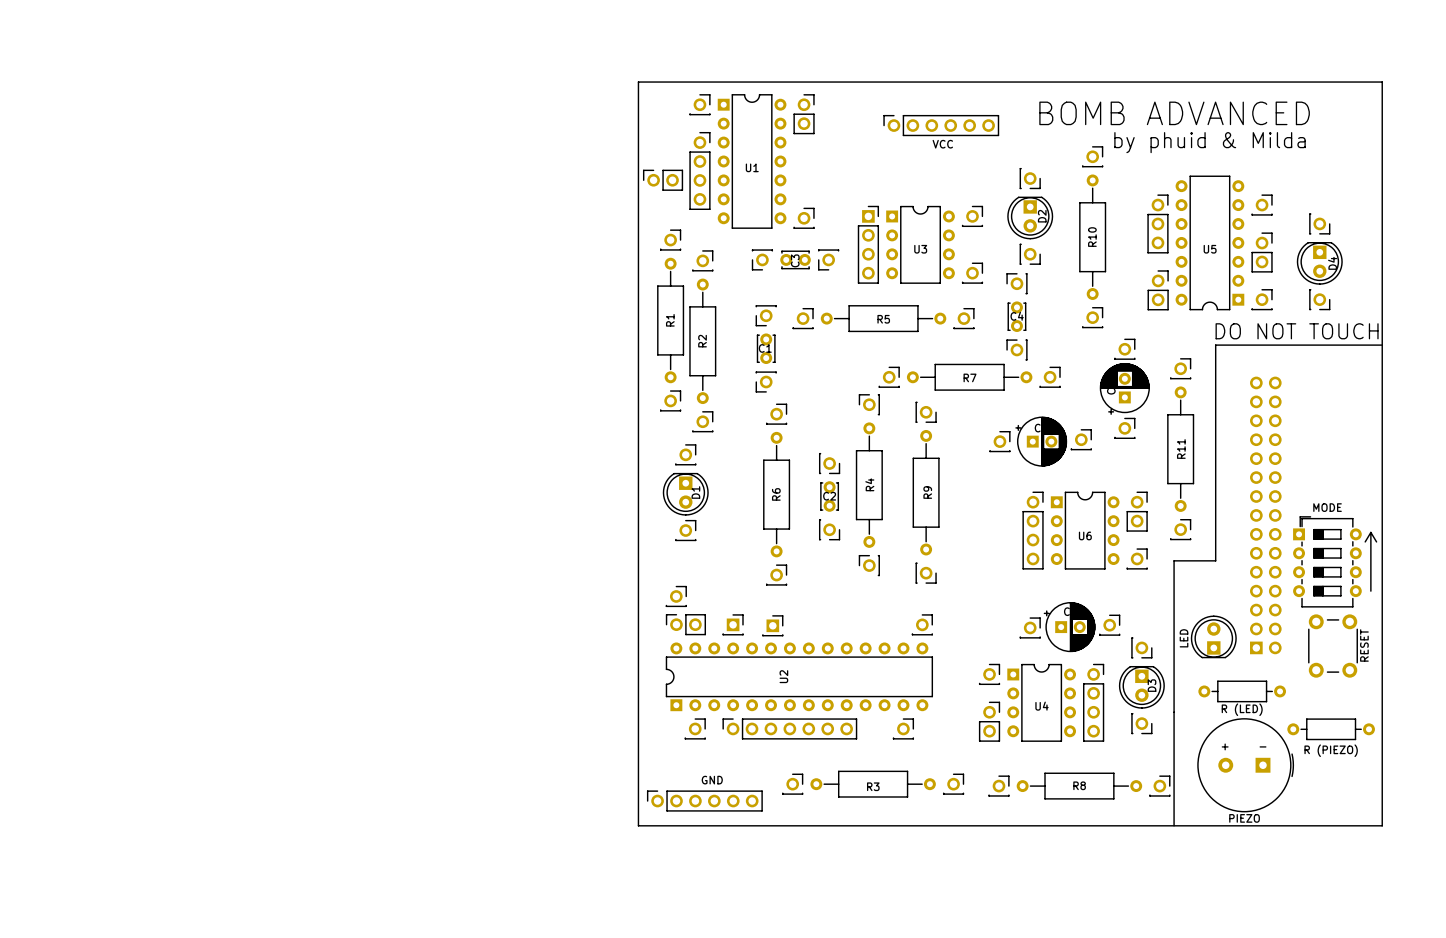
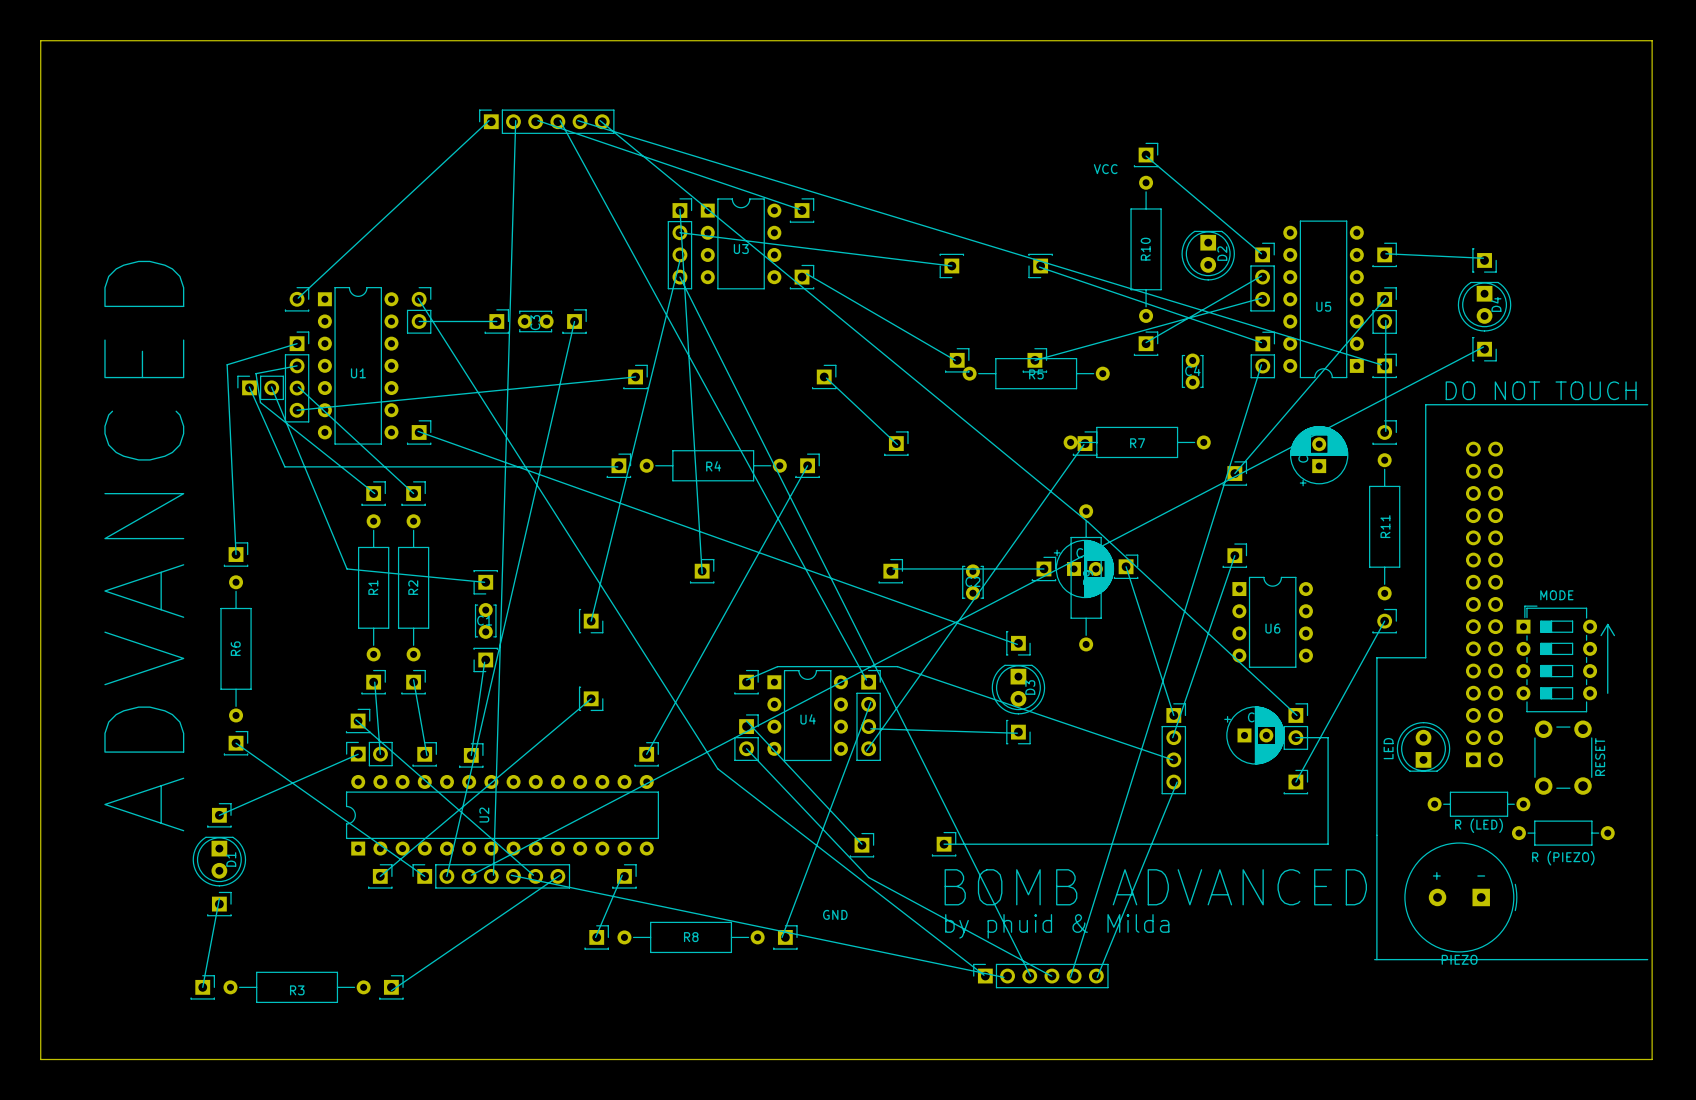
board edge: none -> (40, 40) (1652, 40) (1652, 1059) (40, 1059) (40, 40)
board edge: (638, 82) (1382, 82) (1382, 825) (638, 825) (638, 82) -> none
line: none -> (489, 120) (298, 298)
line: none -> (515, 120) (493, 875)
line: none -> (537, 120) (799, 209)
line: none -> (560, 120) (866, 679)
line: none -> (577, 120) (1381, 364)
line: none -> (600, 120) (1088, 522) (1296, 715)
part: none -> (546, 121)
part: (699, 104) -> none
text: BOMB ADVANCED (1174, 113) -> none
part: (804, 114) -> none
part: (941, 125) -> none
part: none -> (1146, 155)
line: none -> (1146, 156) (1261, 253)
text: by phuid & Milda (1210, 142) -> none
part: (1092, 156) -> none
U1 position: (752, 161) -> (358, 365)
part: (699, 170) -> none
line: none -> (679, 209) (702, 573)
part: (1030, 178) -> none
part: none -> (802, 210)
part: (663, 180) -> none
line: none -> (679, 232) (951, 266)
part: (1262, 205) -> none
part: none -> (679, 243)
part: (972, 216) -> none
line: none -> (1385, 253) (1483, 258)
part: none -> (1384, 254)
part: (804, 218) -> none
line: none -> (679, 260) (591, 621)
part: none -> (1484, 260)
part: (1157, 223) -> none
part: (1319, 223) -> none
part: none -> (951, 266)
part: none -> (1040, 266)
line: none -> (1039, 267) (1261, 342)
line: none -> (806, 273) (955, 360)
line: none -> (1261, 275) (1146, 342)
line: none -> (679, 277) (1030, 976)
part: none -> (802, 277)
part: none -> (1262, 277)
R10 position: (1092, 237) -> (1146, 249)
part: (670, 240) -> none
U5 position: (1209, 242) -> (1323, 299)
D4 footprint: [1297, 242, 1343, 285] -> [1457, 281, 1512, 332]
part: (868, 244) -> none
U3 position: (920, 244) -> (741, 243)
part: (1262, 252) -> none
line: none -> (418, 298) (717, 768) (984, 975)
part: (1030, 254) -> none
line: none -> (1261, 298) (1035, 360)
line: none -> (1385, 298) (1234, 473)
part: none -> (297, 299)
part: (762, 259) -> none
C3 position: (795, 259) -> (535, 321)
part: (828, 259) -> none
part: (702, 260) -> none
part: none -> (419, 310)
part: none -> (1384, 310)
part: (972, 273) -> none
line: none -> (1385, 320) (1385, 431)
line: none -> (419, 321) (496, 321)
part: none -> (496, 321)
line: none -> (574, 321) (446, 876)
part: none -> (574, 321)
part: (1016, 283) -> none
part footprint: [1251, 289, 1273, 311] -> [1472, 337, 1497, 362]
part: (1158, 290) -> none
line: none -> (297, 343) (227, 364) (236, 554)
part: none -> (1146, 343)
line: none -> (1483, 347) (471, 875)
part: (1319, 299) -> none
part: none -> (1262, 354)
part: none -> (957, 360)
part: none -> (1034, 360)
line: none -> (297, 365) (256, 373) (260, 402) (374, 493)
line: none -> (1261, 364) (1070, 977)
part: none -> (1384, 365)
part: (766, 315) -> none
part: (1092, 317) -> none
part: (803, 318) -> none
part: (963, 318) -> none
R1 position: (670, 320) -> (373, 587)
part: none -> (297, 376)
line: none -> (635, 376) (297, 410)
part: none -> (635, 376)
part: none -> (824, 376)
line: none -> (826, 378) (897, 444)
line: none -> (249, 386) (284, 466) (617, 466)
line: none -> (271, 386) (347, 568) (484, 582)
line: none -> (298, 386) (413, 493)
part: none -> (260, 387)
text position: DO NOT TOUCH (1297, 331) -> DO NOT TOUCH (1541, 390)
R2 position: (702, 341) -> (413, 587)
line: none -> (1621, 404) (1647, 404)
C1 position: (766, 348) -> (485, 620)
part: (1016, 349) -> none
part: (1124, 349) -> none
line: none -> (418, 431) (1017, 644)
part: none -> (419, 432)
part footprint: [755, 371, 777, 393] -> [884, 431, 909, 456]
part: (889, 377) -> none
part: (1050, 377) -> none
part: none -> (1085, 443)
line: none -> (1083, 444) (866, 750)
part: none -> (618, 465)
line: none -> (807, 465) (646, 754)
part: none -> (807, 465)
part: (670, 400) -> none
part: none -> (1234, 473)
part: (869, 404) -> none
part: (926, 412) -> none
part: (776, 414) -> none
part: none -> (373, 493)
part: none -> (413, 493)
part: (702, 421) -> none
part: (1124, 428) -> none
part: (1081, 439) -> none
part: (999, 441) -> none
part position: (1041, 441) -> (1083, 568)
part: (685, 454) -> none
part: (829, 463) -> none
text: none -> ADVANCED (144, 546)
part: none -> (236, 554)
D1 footprint: [663, 473, 709, 516] -> [192, 836, 247, 887]
line: none -> (1234, 555) (1172, 737)
part: none -> (1234, 555)
line: none -> (1126, 566) (1173, 715)
part: none -> (1126, 566)
line: none -> (893, 568) (1043, 568)
R4 rotation: 0° (869, 485) -> 90° clockwise (713, 465)
R4 position: (869, 485) -> (713, 465)
part: none -> (1043, 568)
part: none -> (702, 571)
part: none -> (890, 571)
R6 position: (776, 494) -> (236, 648)
part: none -> (485, 582)
part: (1137, 511) -> none
part: none -> (591, 621)
part: (829, 529) -> none
line: none -> (1384, 621) (1295, 782)
part: (685, 530) -> none
part: (1033, 530) -> none
part: none -> (1018, 643)
part: (1137, 558) -> none
part: none -> (485, 659)
line: none -> (484, 662) (471, 755)
part: (869, 565) -> none
part: (926, 573) -> none
part: (776, 575) -> none
line: none -> (413, 679) (426, 755)
line: none -> (746, 679) (777, 666) (897, 666) (1172, 759)
part: none -> (373, 682)
line: none -> (374, 682) (380, 754)
part: none -> (413, 682)
part: none -> (746, 682)
line: none -> (591, 698) (380, 876)
part: none -> (591, 698)
part: (676, 596) -> none
line: none -> (870, 702) (782, 937)
part: none -> (868, 715)
line: none -> (355, 719) (533, 875)
part: none -> (358, 721)
line: none -> (746, 721) (861, 844)
part footprint: [1099, 614, 1121, 636] -> [1283, 703, 1309, 750]
line: none -> (870, 728) (1017, 733)
part: (685, 624) -> none
part: (733, 624) -> none
part: none -> (1018, 732)
part: (922, 624) -> none
part: (772, 625) -> none
part: (1030, 627) -> none
part: none -> (746, 737)
line: none -> (1295, 737) (1328, 737) (1328, 844) (944, 844)
line: none -> (236, 743) (424, 876)
part: none -> (236, 743)
line: none -> (746, 748) (868, 877) (1051, 976)
part: none -> (1173, 748)
part: none -> (369, 754)
line: none -> (358, 754) (219, 815)
part: none -> (424, 754)
part: none -> (646, 754)
part: none -> (471, 755)
part: (1141, 647) -> none
line: none -> (1177, 782) (1097, 977)
part: none -> (1295, 782)
D3 footprint: [1119, 666, 1165, 709] -> [991, 664, 1046, 715]
part: (989, 674) -> none
U2 position: (799, 676) -> (502, 815)
R (LED) position: (1242, 691) -> (1479, 804)
part: none -> (219, 815)
U4 position: (1041, 702) -> (807, 715)
part: (1093, 702) -> none
part: none -> (944, 844)
part: none -> (861, 845)
part: (989, 721) -> none
part: (1141, 723) -> none
part: (695, 728) -> none
part: (789, 728) -> none
part: (903, 728) -> none
R (PIEZO) position: (1331, 729) -> (1563, 833)
line: none -> (511, 875) (1004, 977)
line: none -> (560, 875) (391, 990)
line: none -> (622, 875) (595, 937)
part: none -> (380, 876)
part: none -> (491, 876)
part: none -> (624, 876)
text: none -> BOMB ADVANCED (1155, 887)
line: none -> (219, 898) (202, 987)
part: none -> (219, 904)
part: (792, 784) -> none
R3 position: (873, 784) -> (297, 987)
part: (953, 784) -> none
part: (998, 786) -> none
R8 position: (1079, 786) -> (691, 937)
part: (1159, 786) -> none
text: none -> by phuid & Milda (1057, 926)
part: none -> (596, 937)
part: none -> (785, 937)
part: (704, 801) -> none
line: none -> (1374, 959) (1647, 959)
line: (1174, 818) (1174, 825) -> none
part: none -> (1040, 976)
part: none -> (202, 987)
part: none -> (391, 987)

